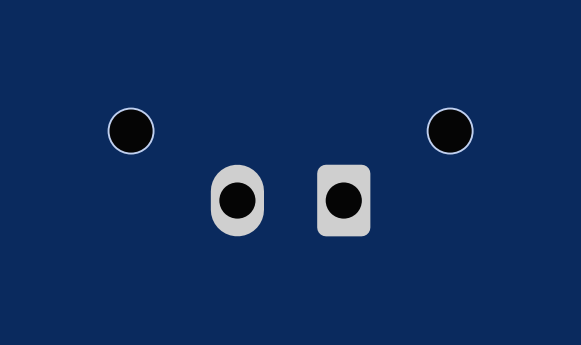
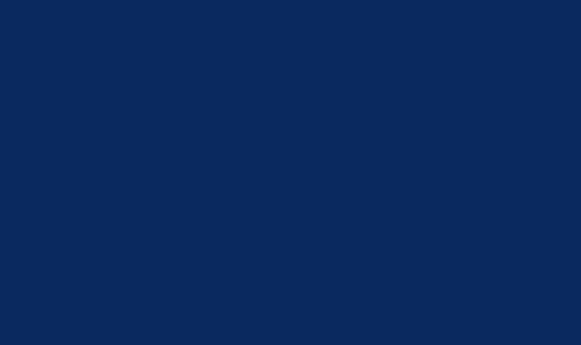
part: (290, 172) -> none

